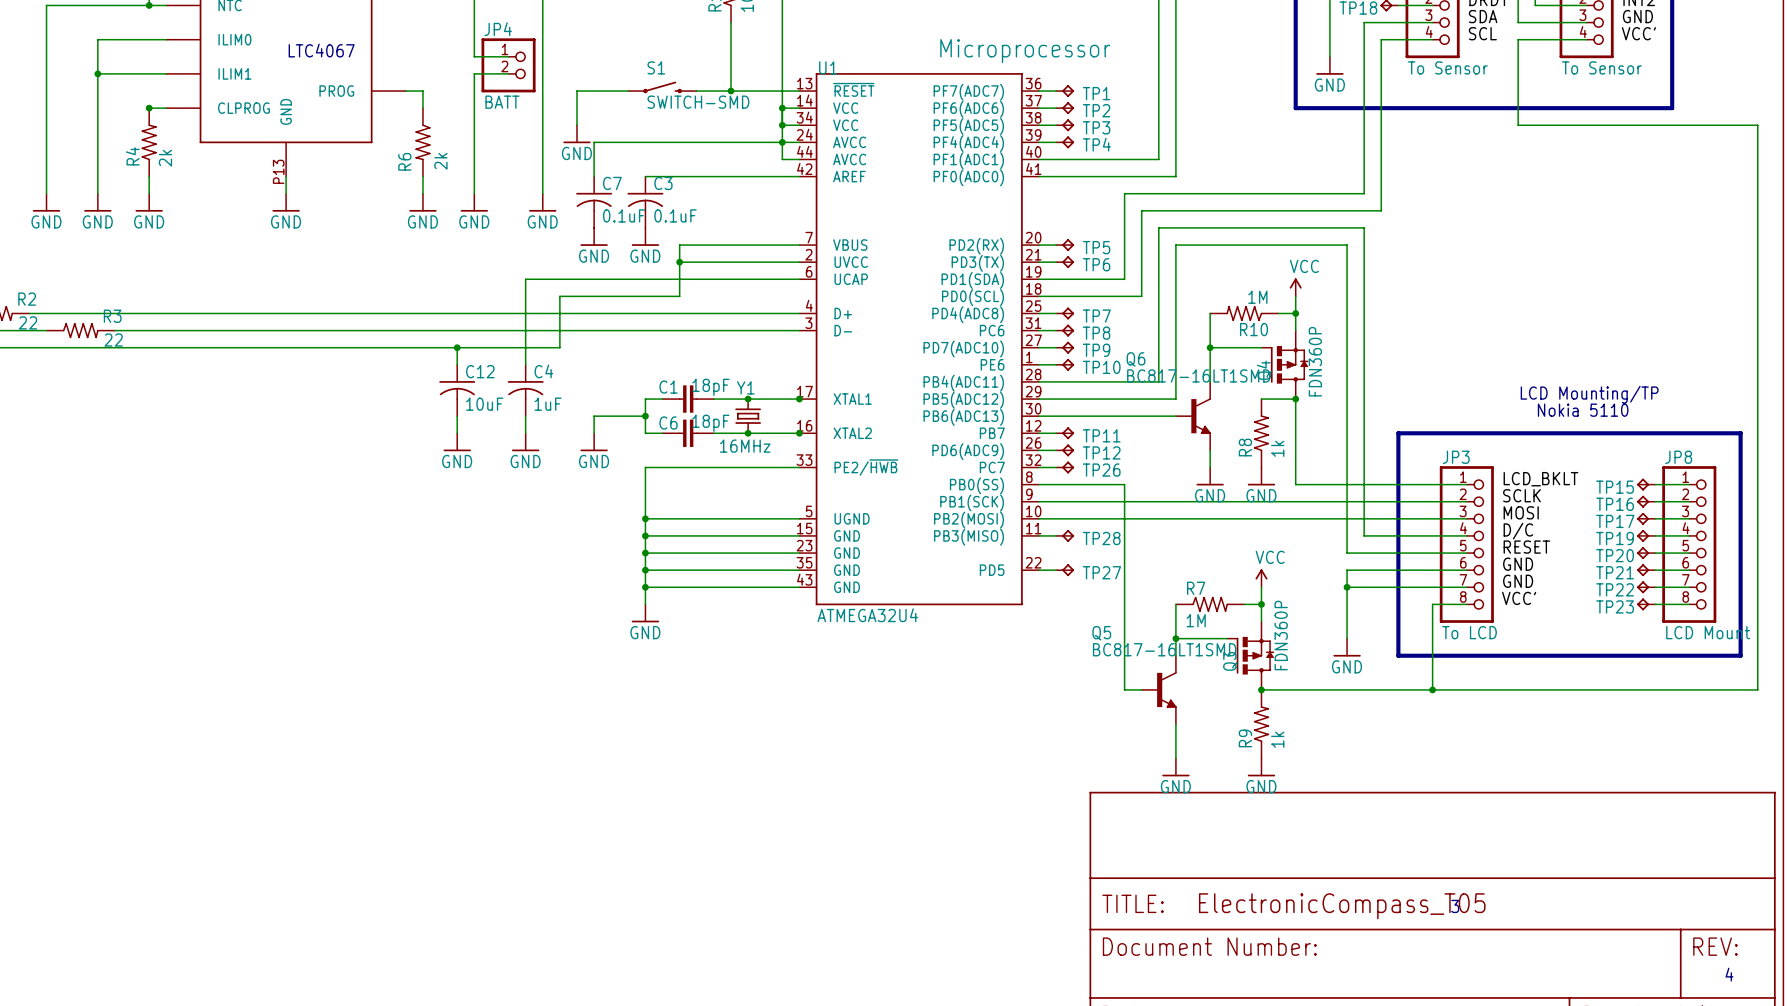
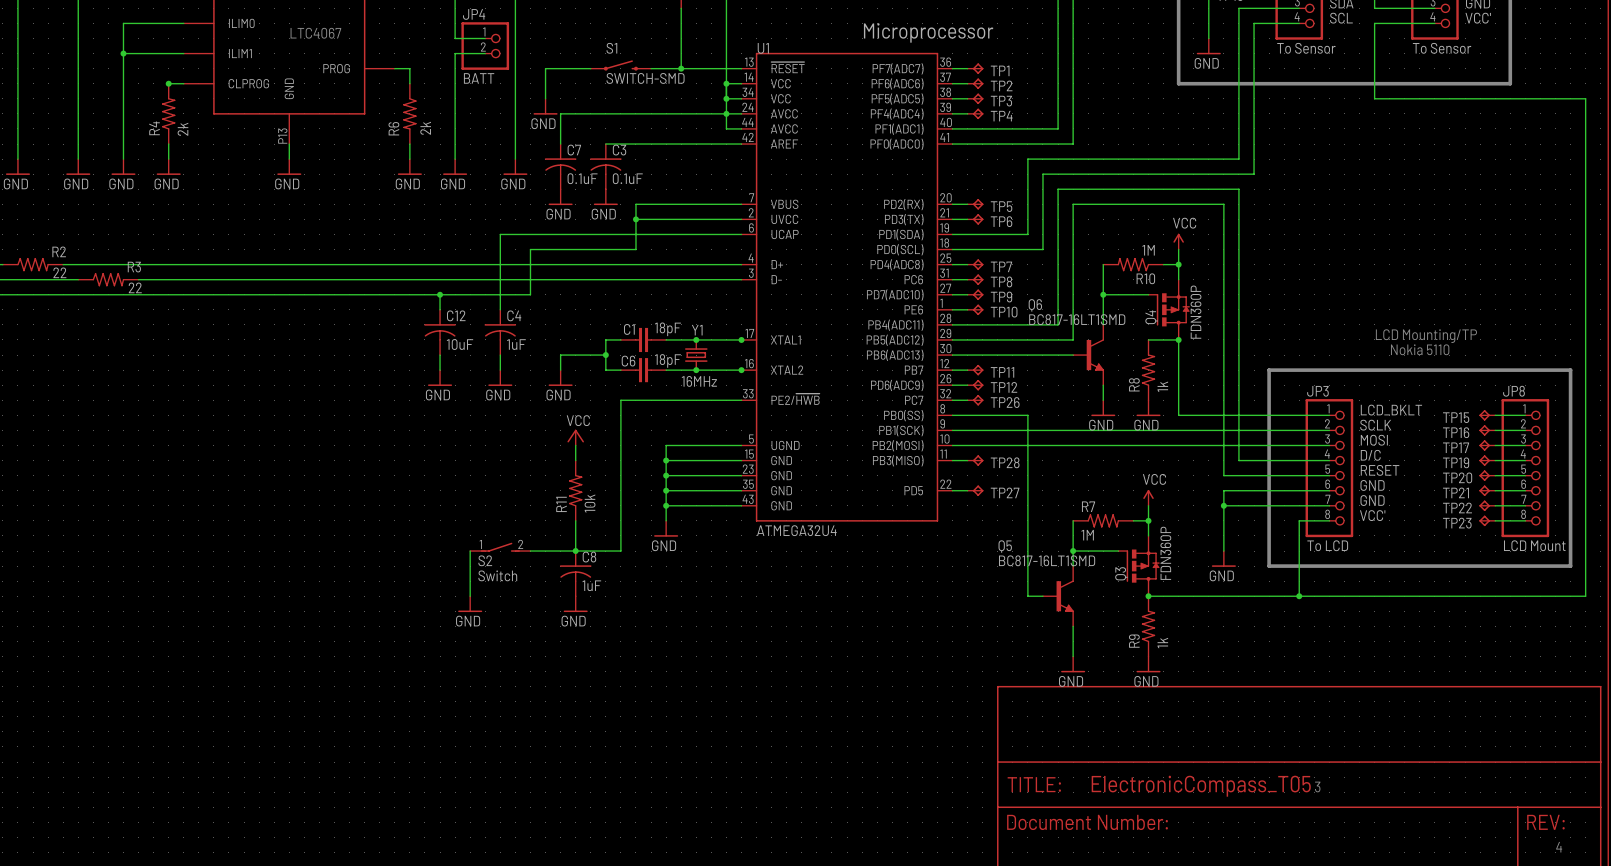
wire: (662, 467) (645, 467) (645, 604) -> (620, 400) (620, 551) (530, 551)
power symbol: none -> VCC (575, 437)
wire: none -> (575, 445) (575, 460)
wire: (645, 518) (713, 518) -> (666, 520) (666, 445)
junction: (645, 518) -> none
wire: (645, 535) (713, 535) -> none
junction: (645, 535) -> none
junction: none -> (666, 460)
wire: (645, 553) (713, 553) -> none
junction: (645, 553) -> none
junction: none -> (666, 475)
R11: none -> 10k (575, 490)
wire: (645, 570) (713, 570) -> none
junction: (645, 570) -> none
junction: none -> (666, 490)
wire: (645, 587) (713, 587) -> none
junction: (645, 587) -> none
junction: none -> (666, 505)
wire: none -> (575, 520) (575, 551)
power symbol: GND (645, 613) -> none
power symbol: none -> GND (666, 528)
S2: none -> Switch (500, 547)
wire: none -> (470, 551) (470, 596)
junction: none -> (575, 551)
C8: none -> 1uF (575, 573)
power symbol: none -> GND (470, 604)
power symbol: none -> GND (575, 604)

